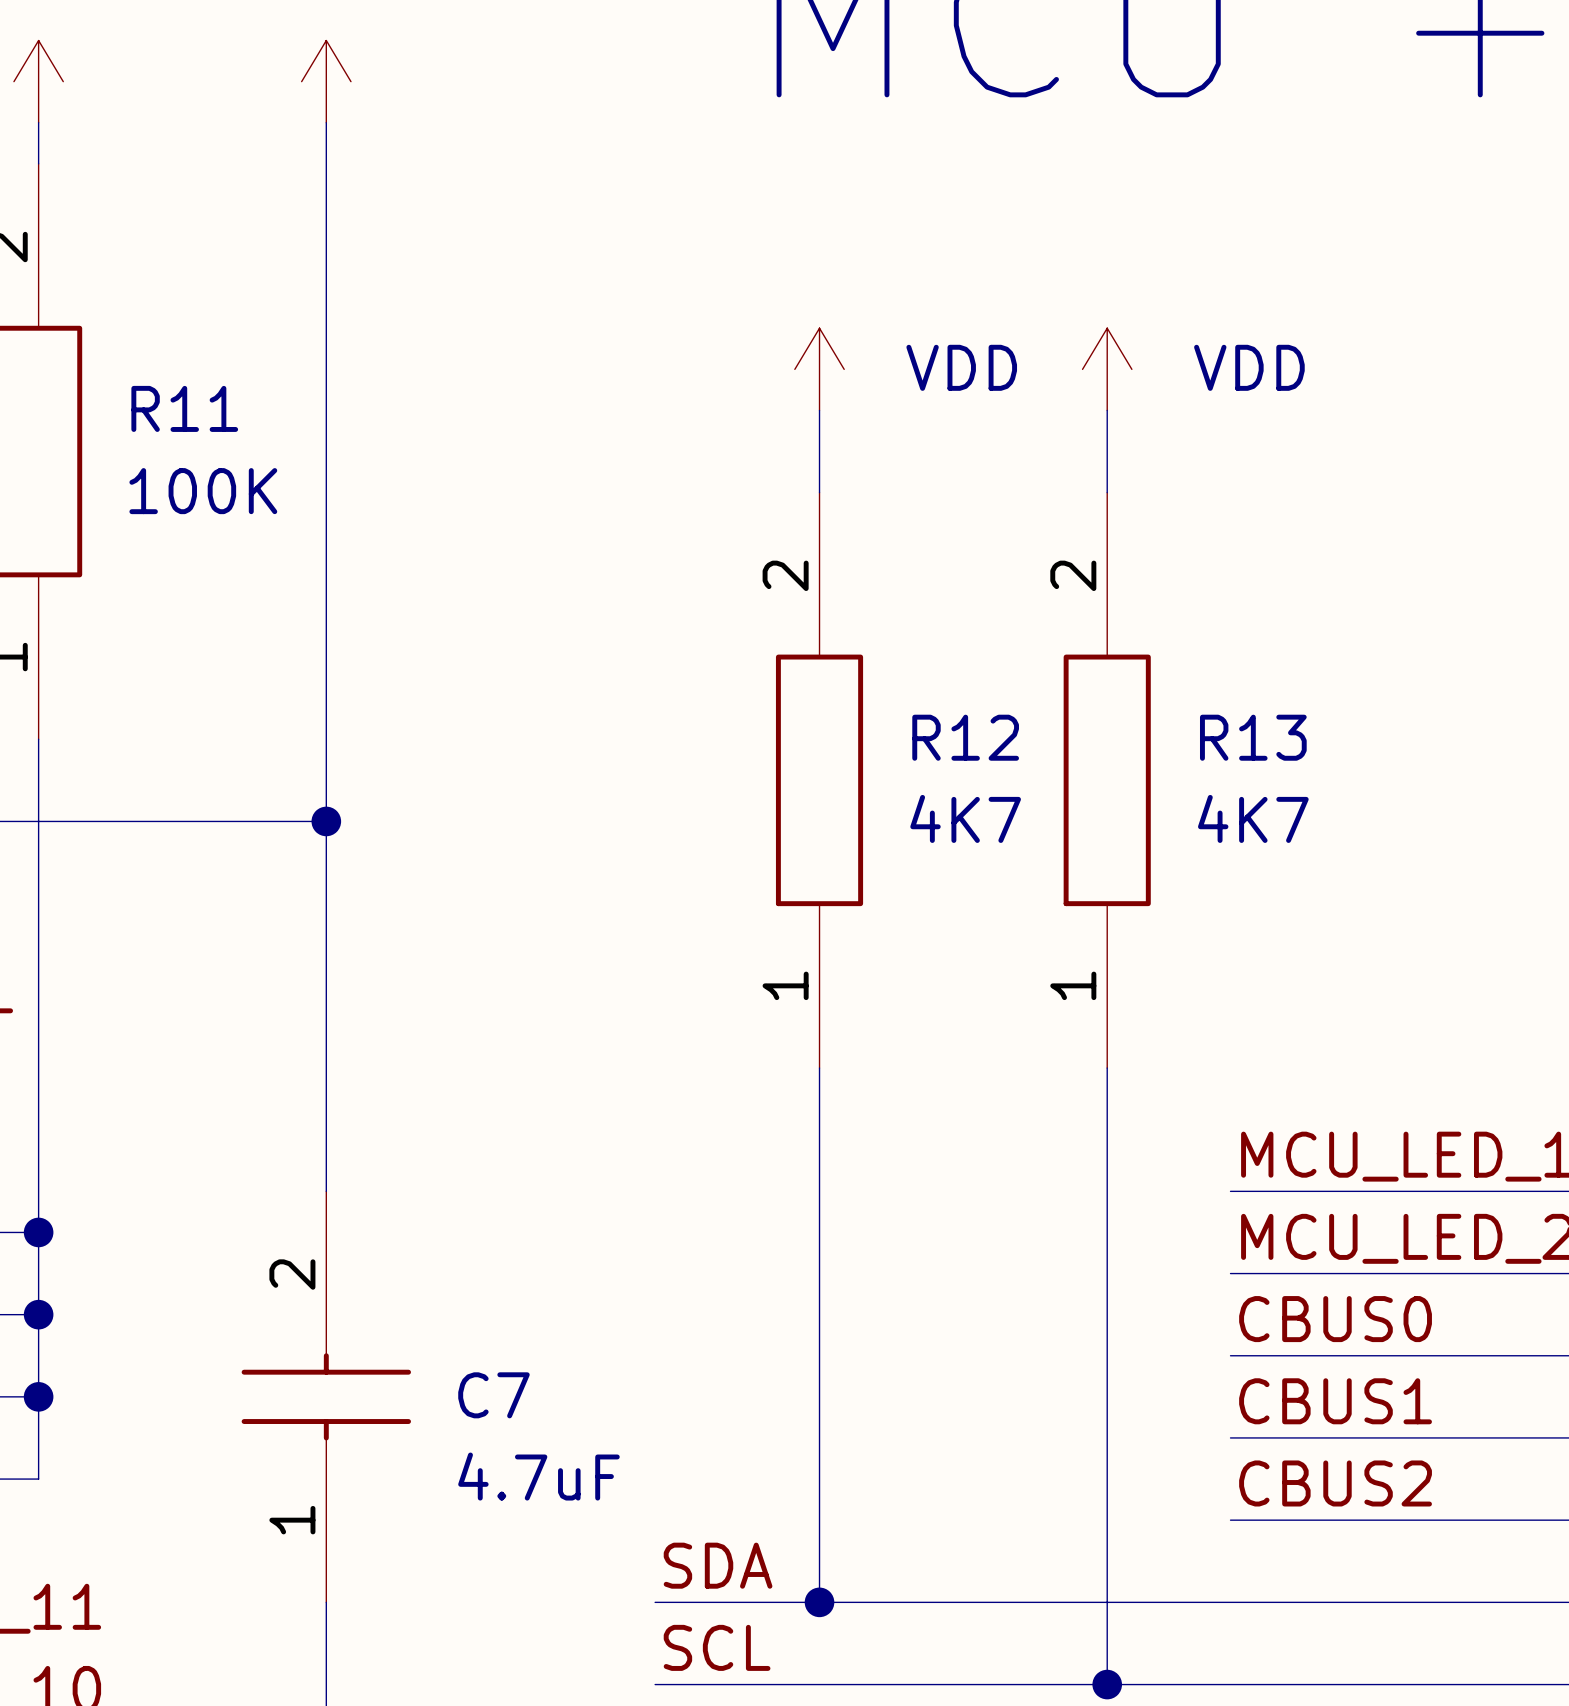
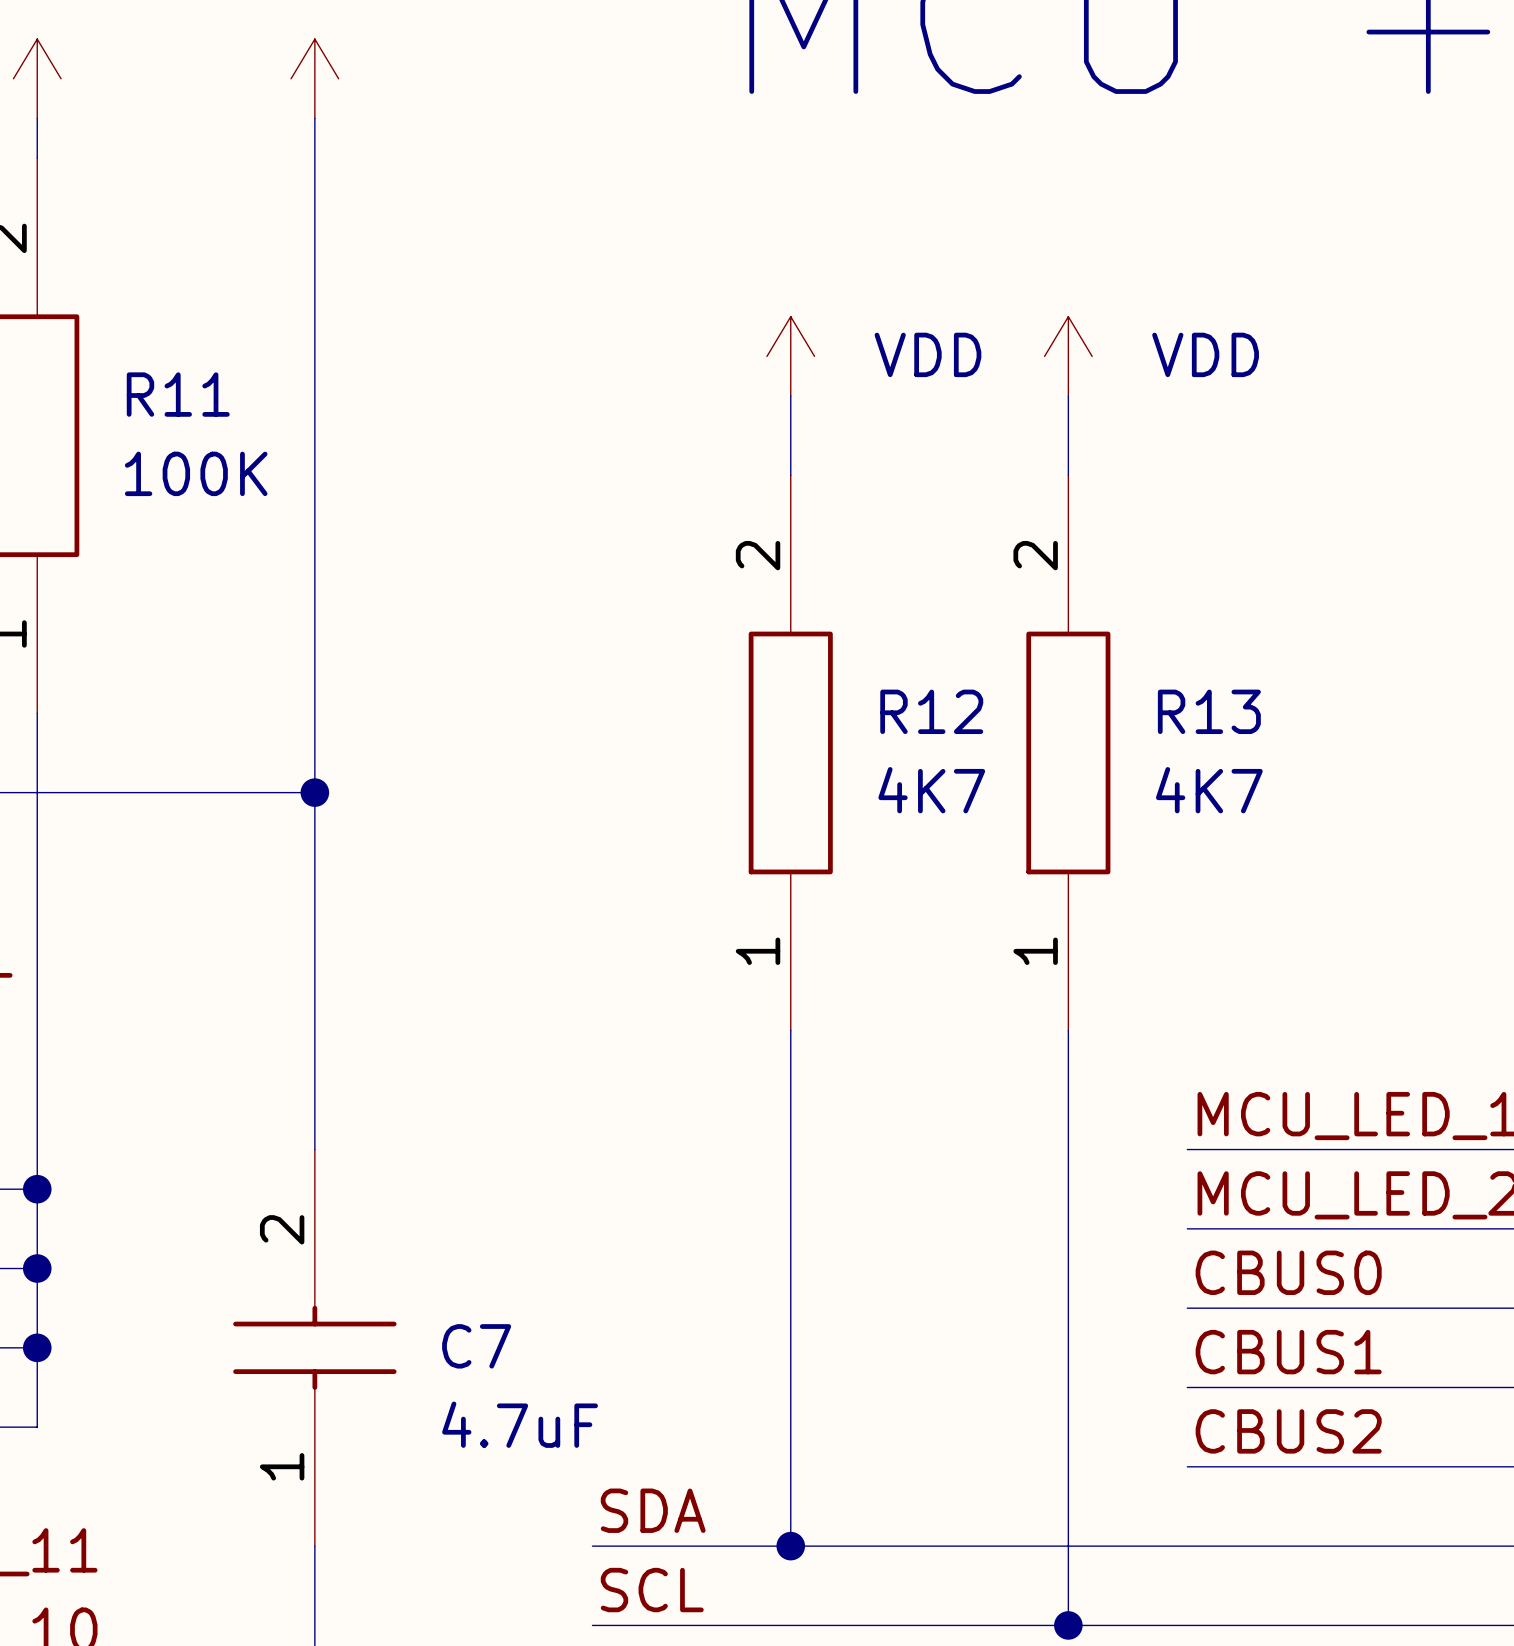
label position: SDA (718, 1565) -> SDA (653, 1510)
wire: none -> (592, 1546) (632, 1546)
label position: SCL (717, 1647) -> SCL (652, 1590)
wire: none -> (592, 1625) (632, 1625)

